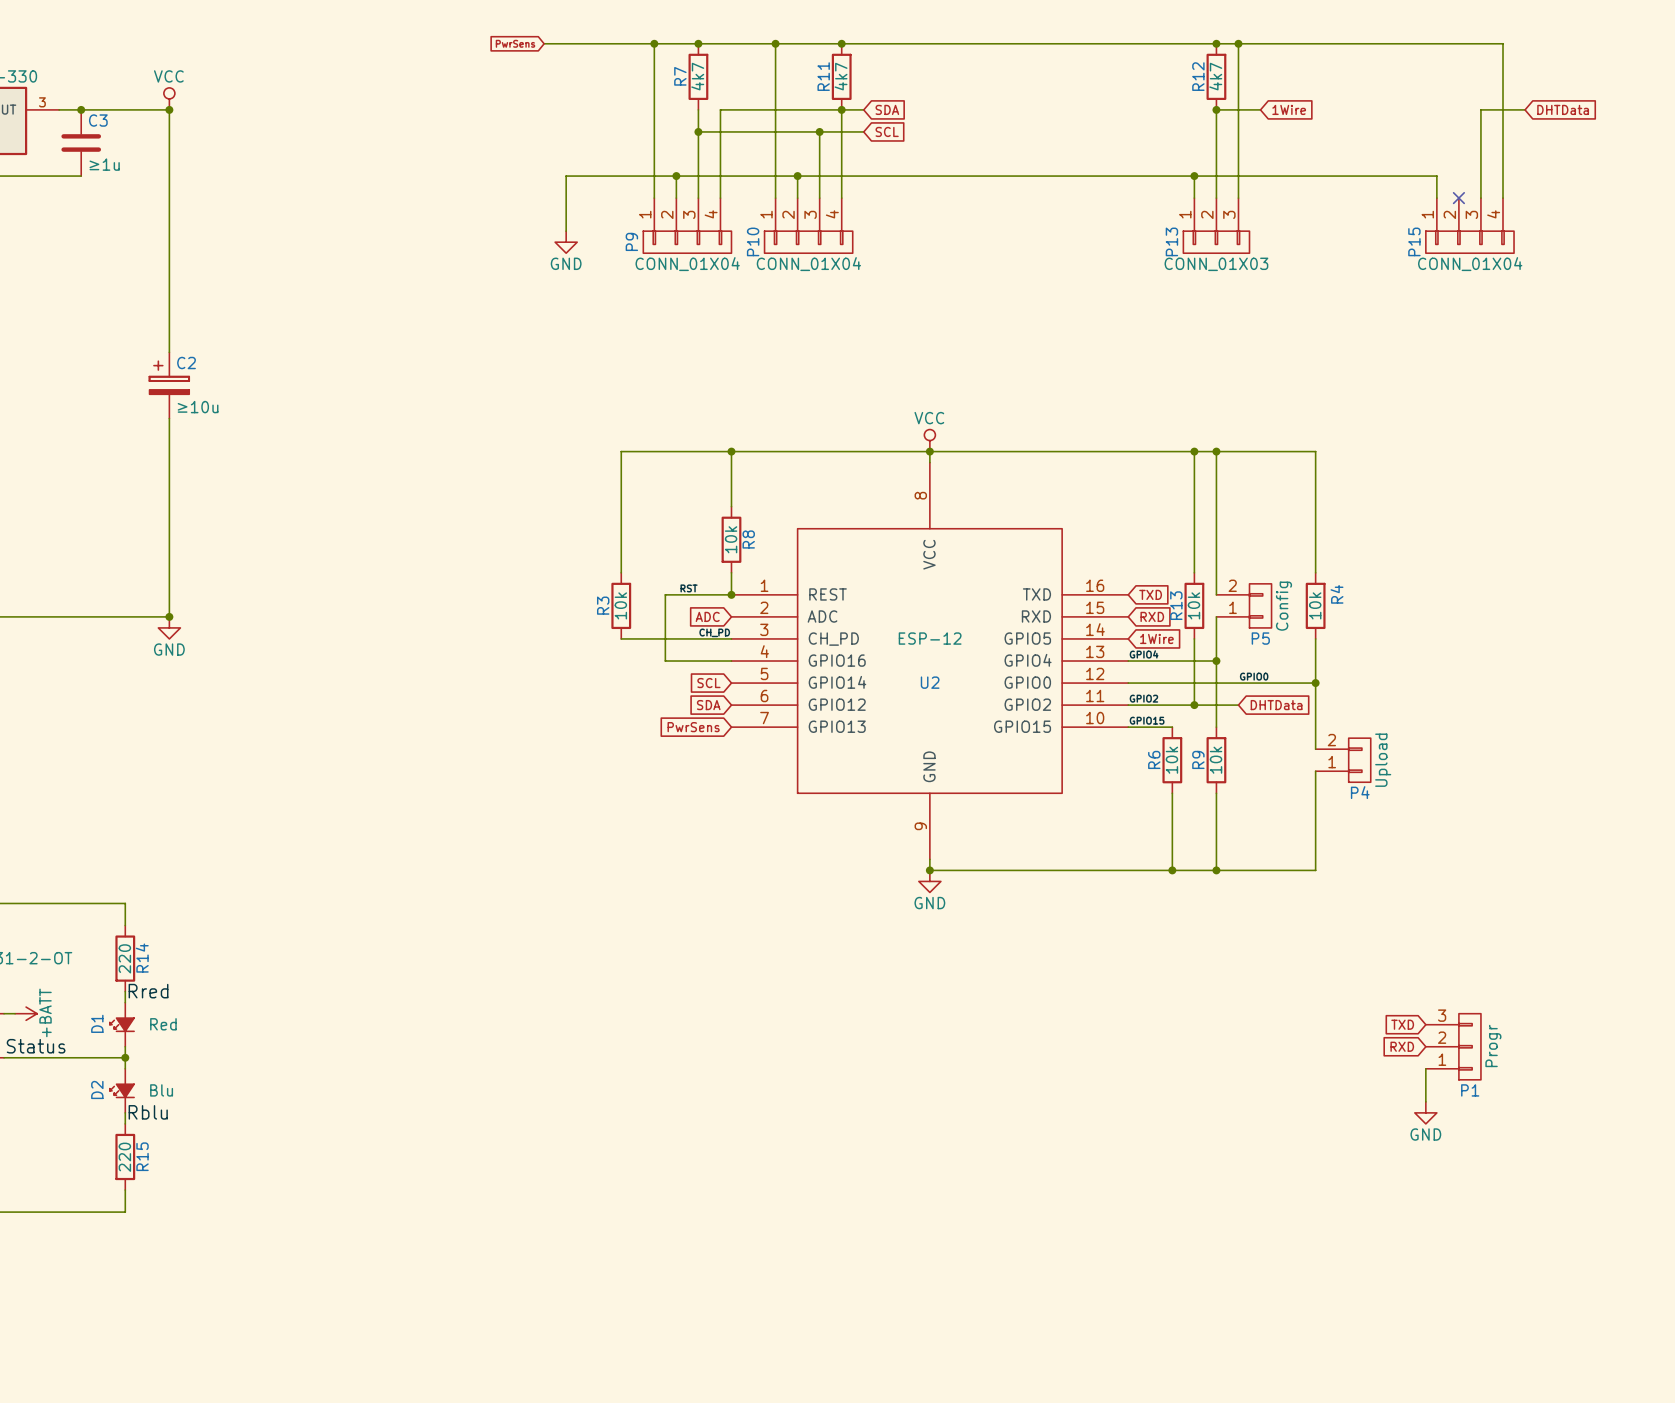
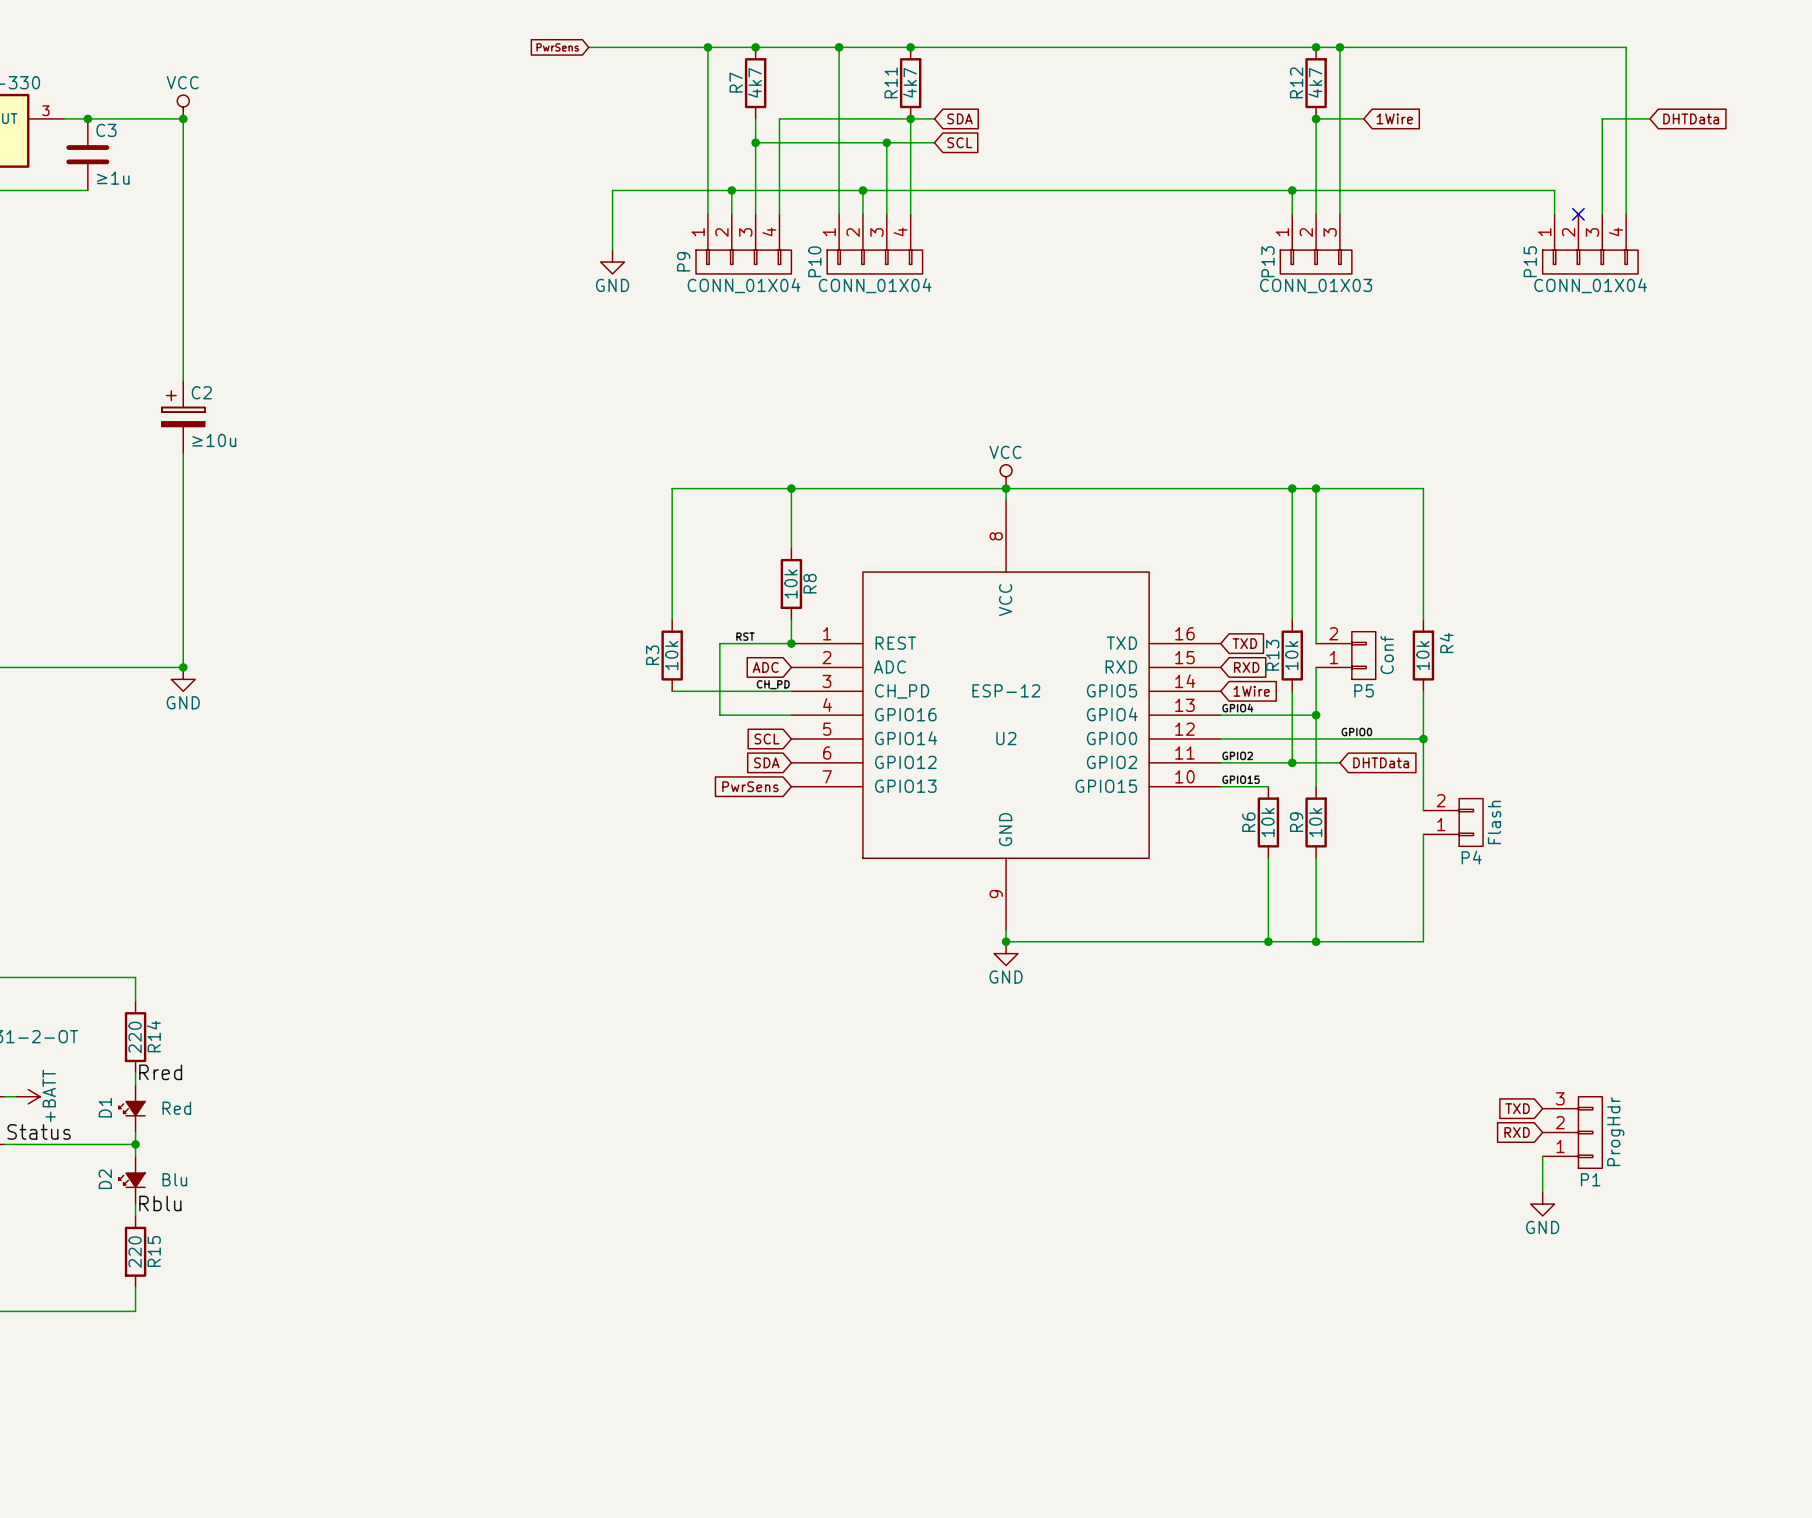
P5 value: Config (1283, 606) -> Conf (1387, 654)
P4 value: Upload (1383, 760) -> Flash (1494, 822)
P1 value: Progr (1493, 1045) -> ProgHdr (1615, 1131)

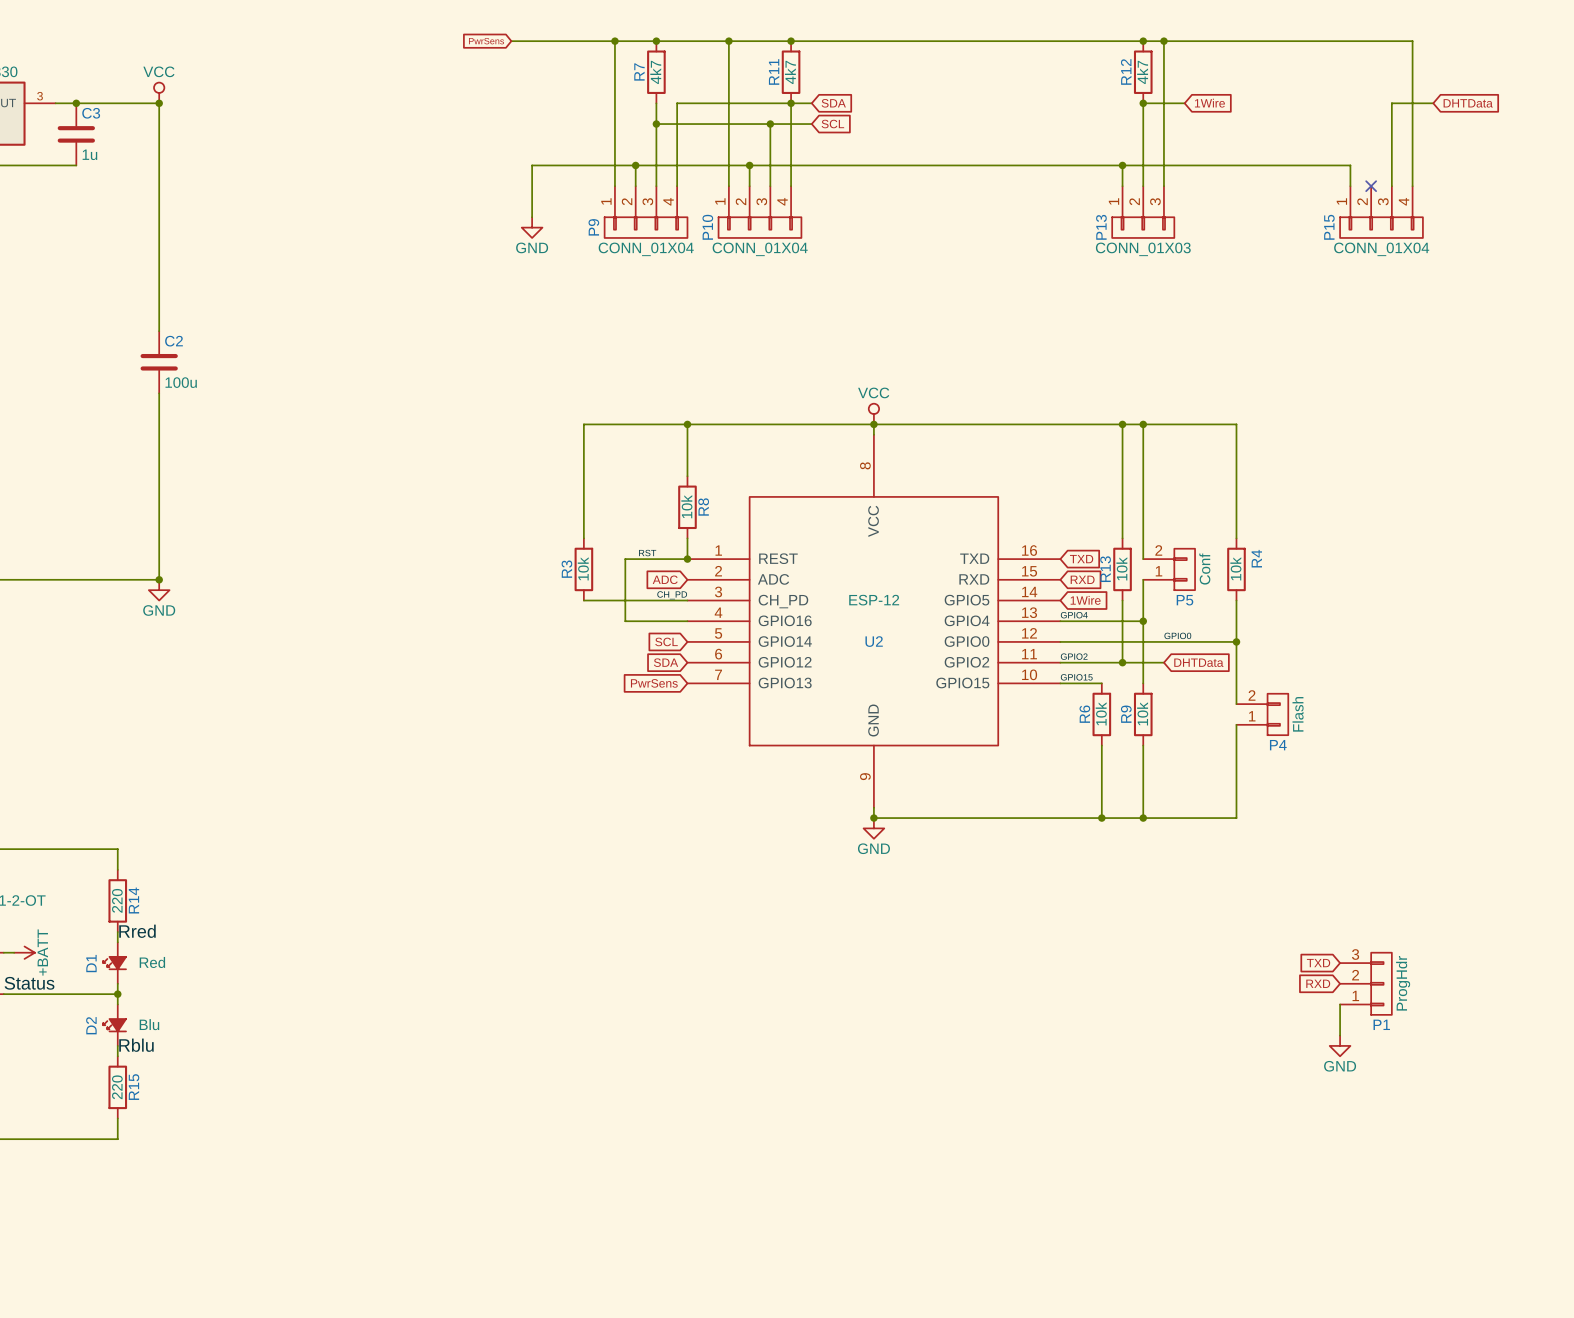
C3 value: ≥1u (113, 178) -> 1u (89, 154)
C2 symbol: [161, 381, 205, 453] -> [140, 331, 178, 394]
C2 value: ≥10u (214, 440) -> 100u (181, 382)

